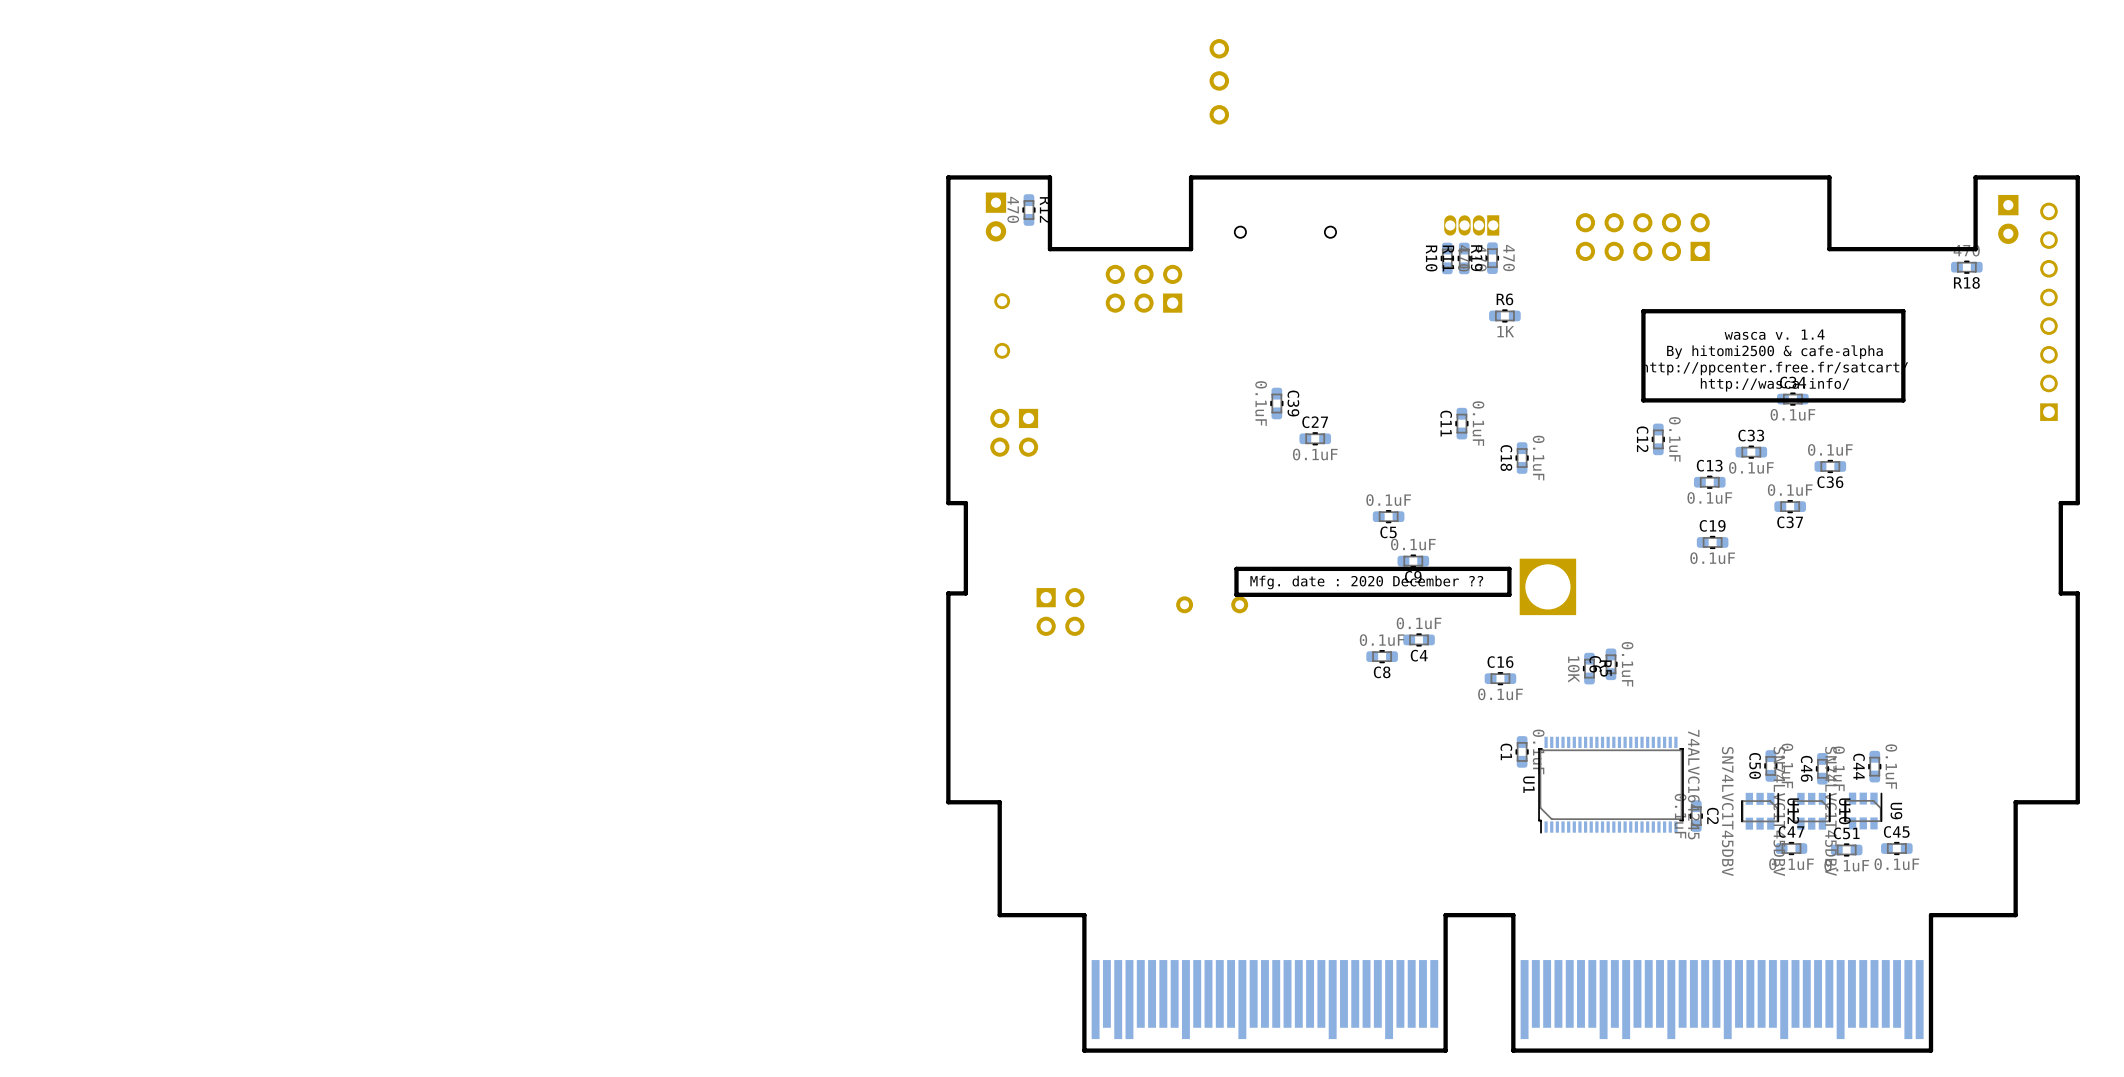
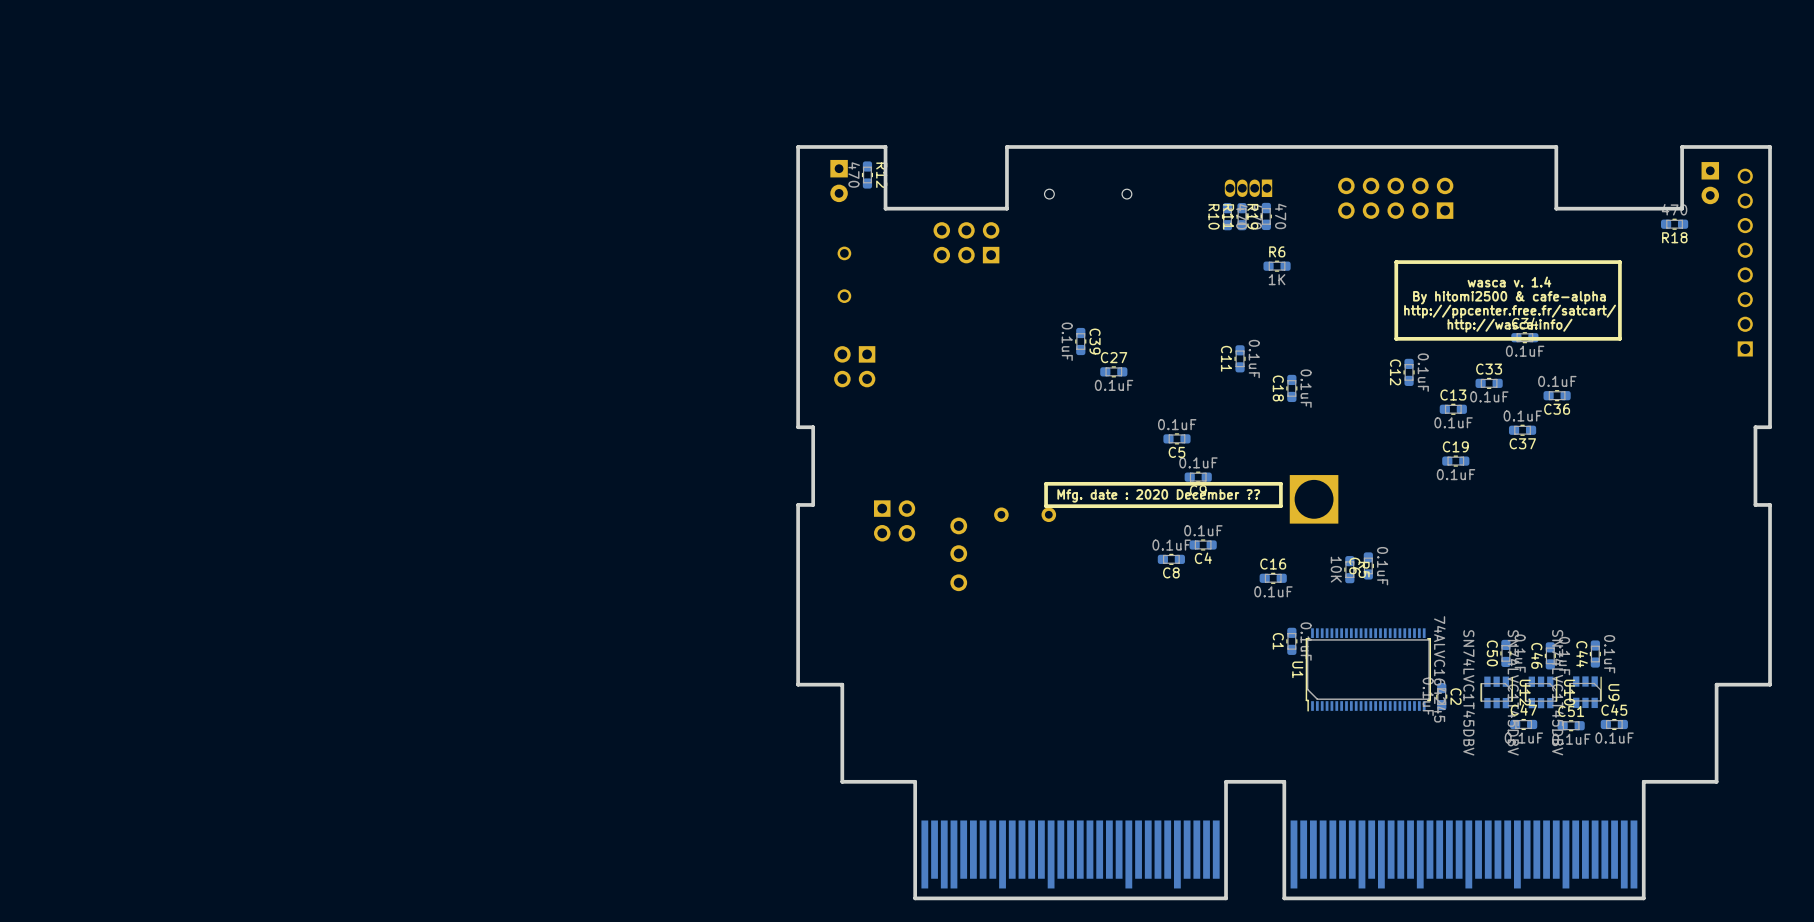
part: (1219, 81) -> none
part: none -> (958, 554)

